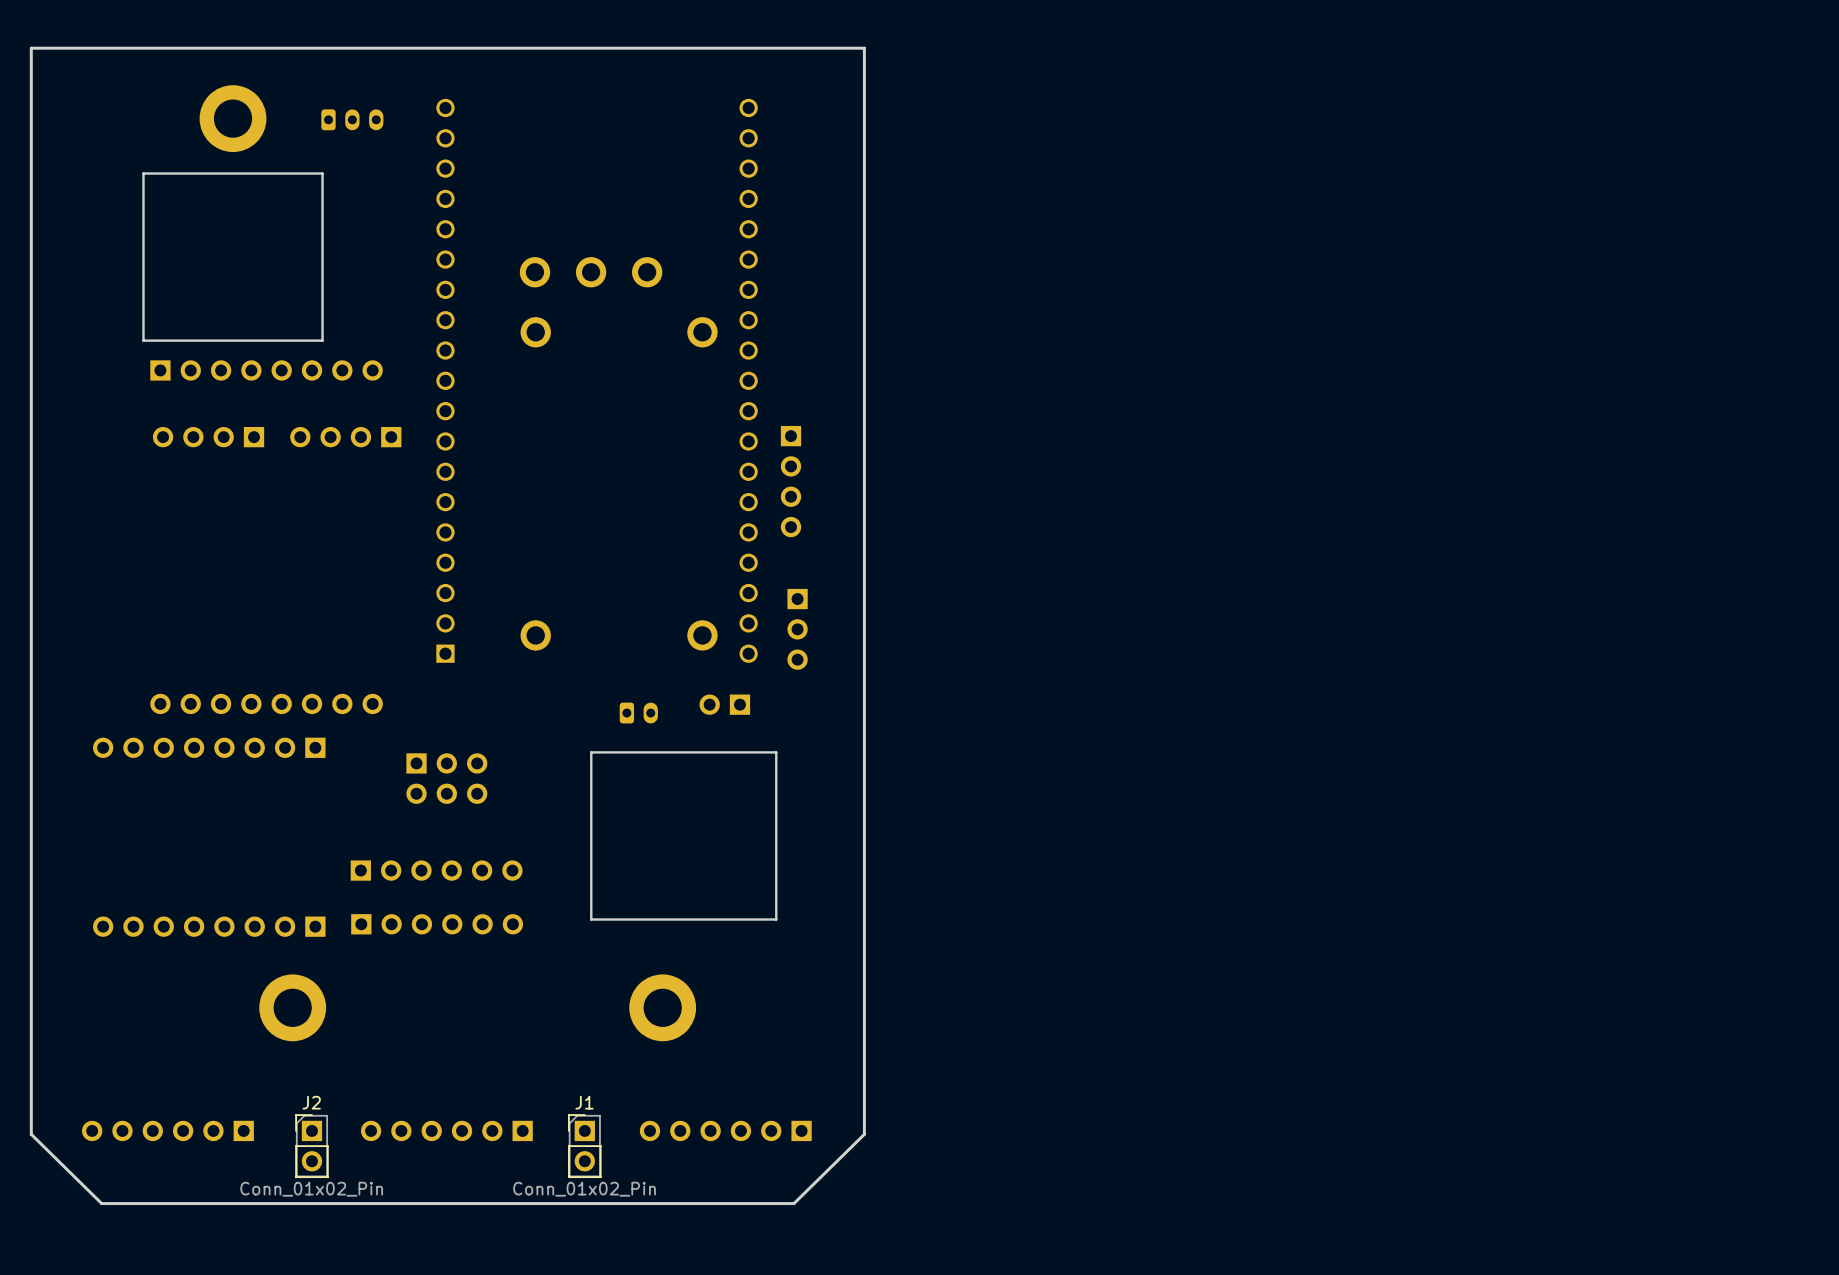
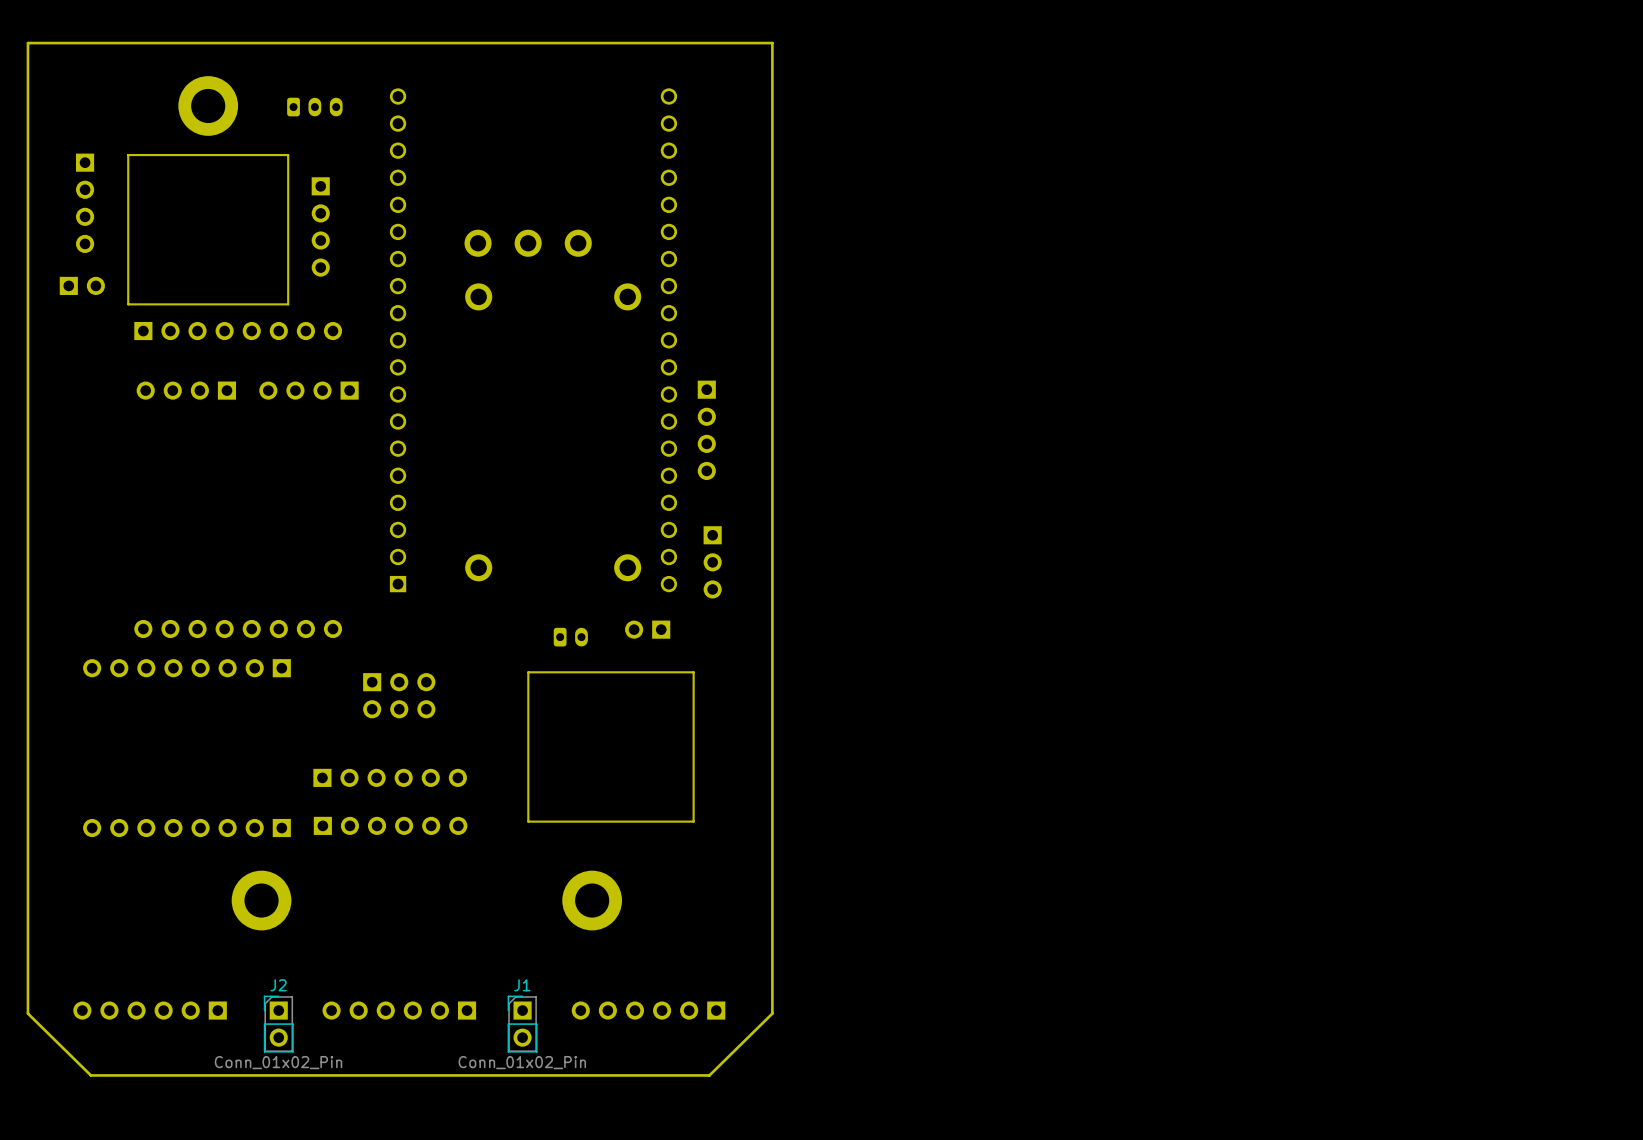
part: none -> (85, 203)
part: none -> (320, 226)
part: none -> (82, 285)

